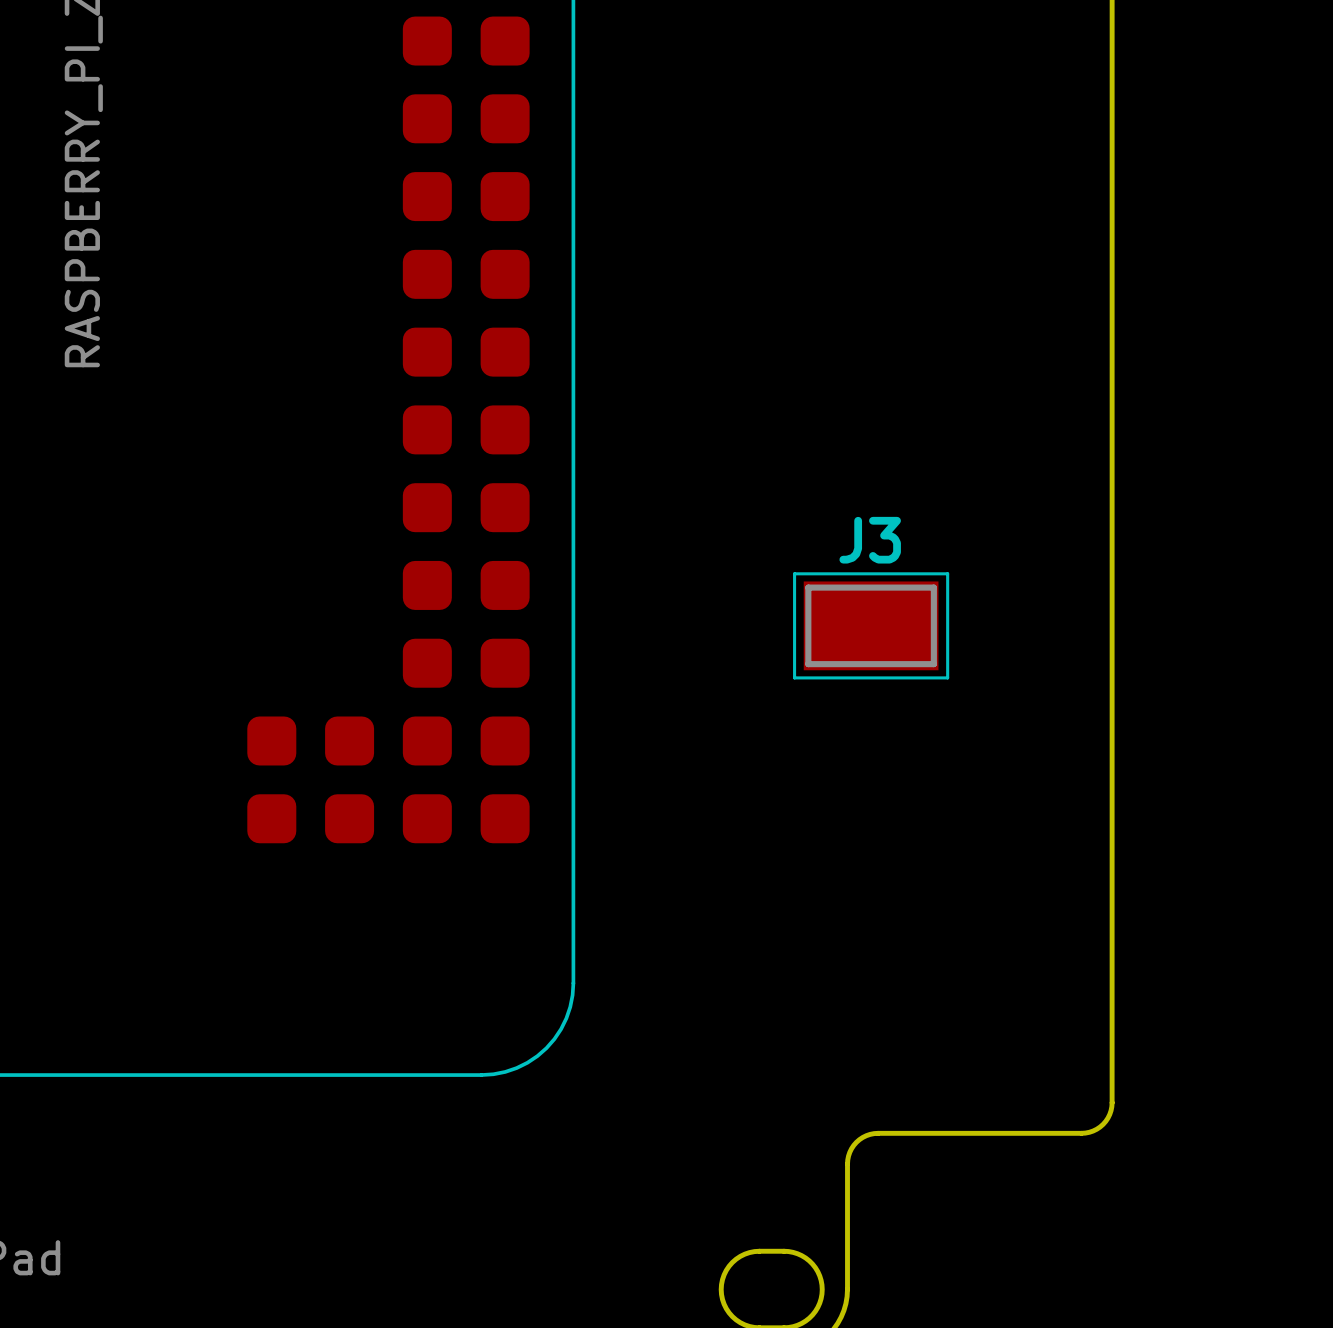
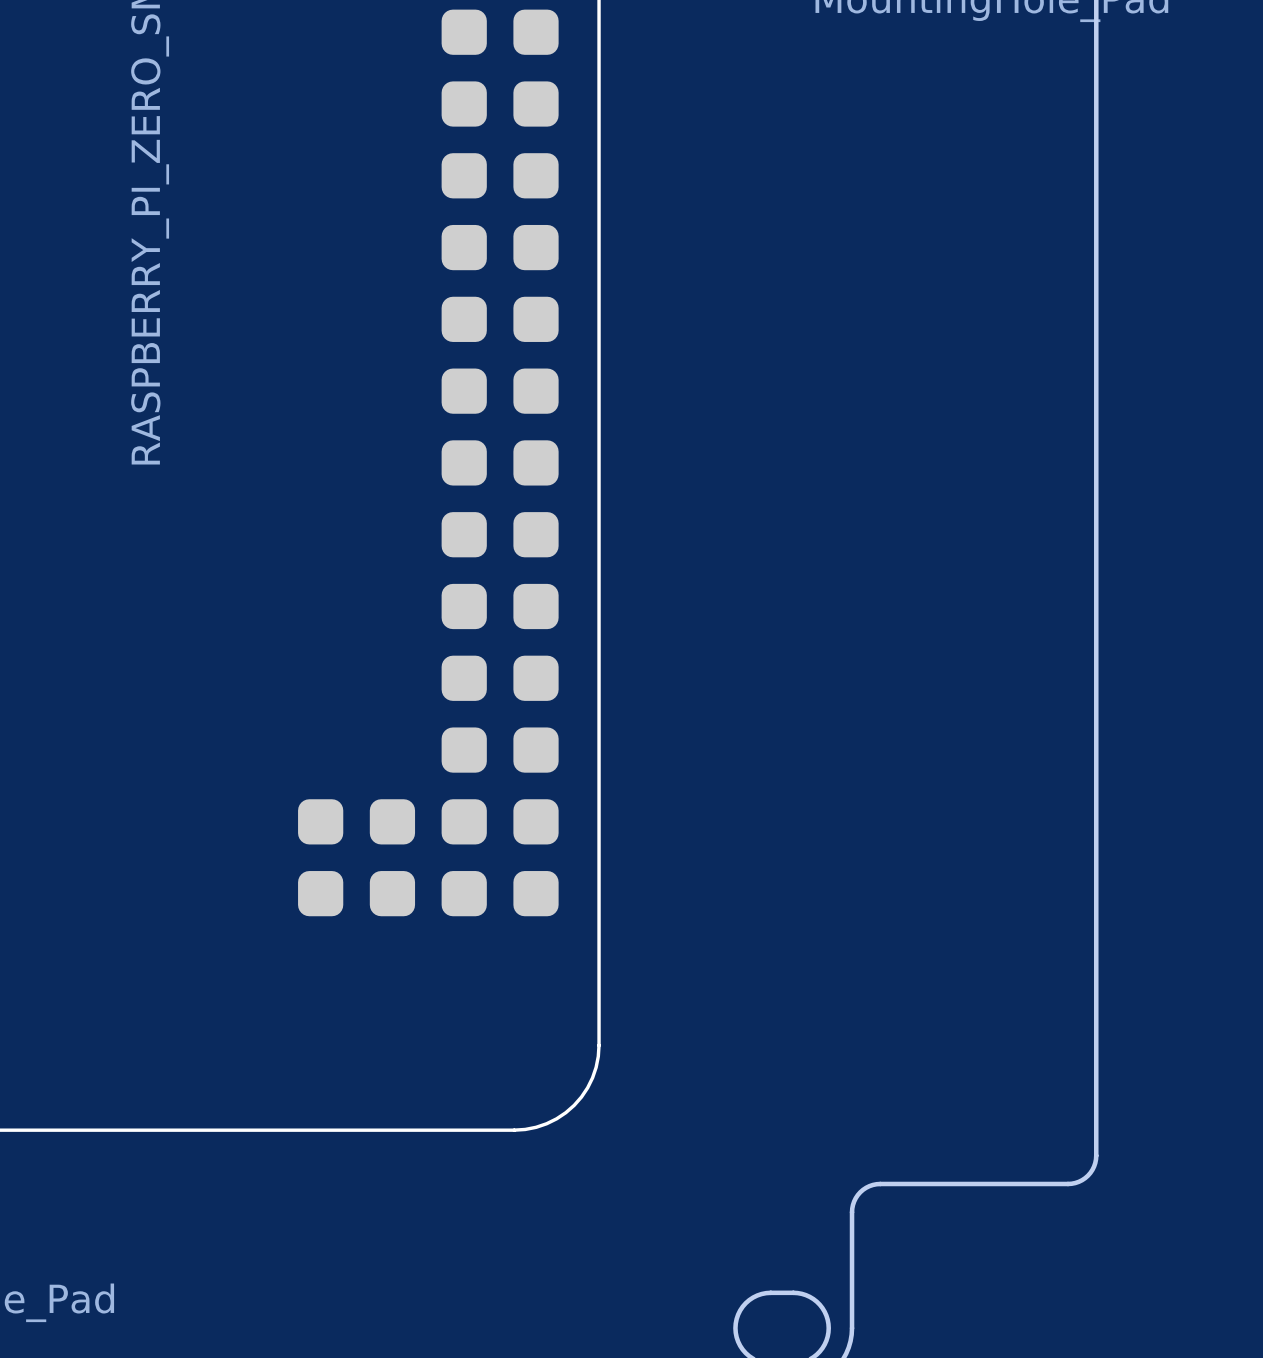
J3: (871, 625) -> none

